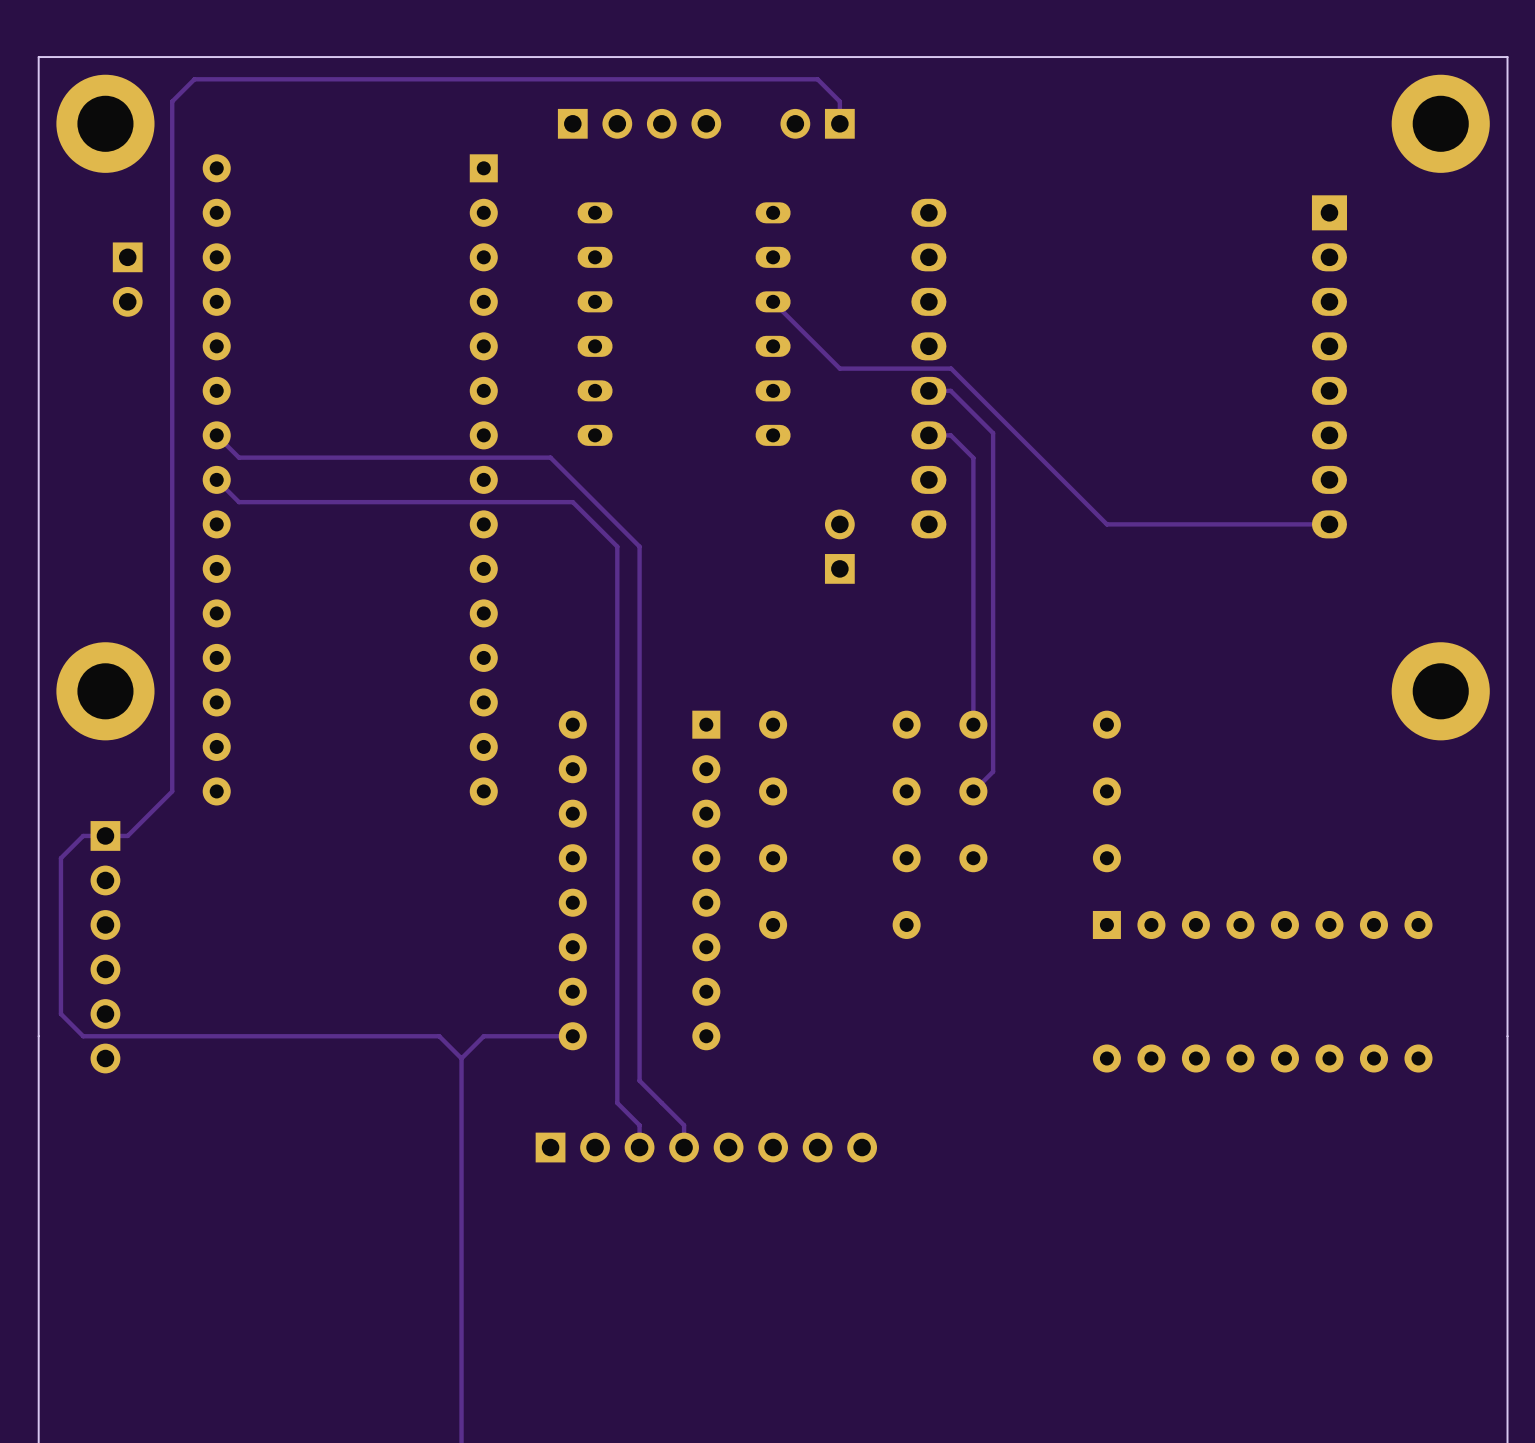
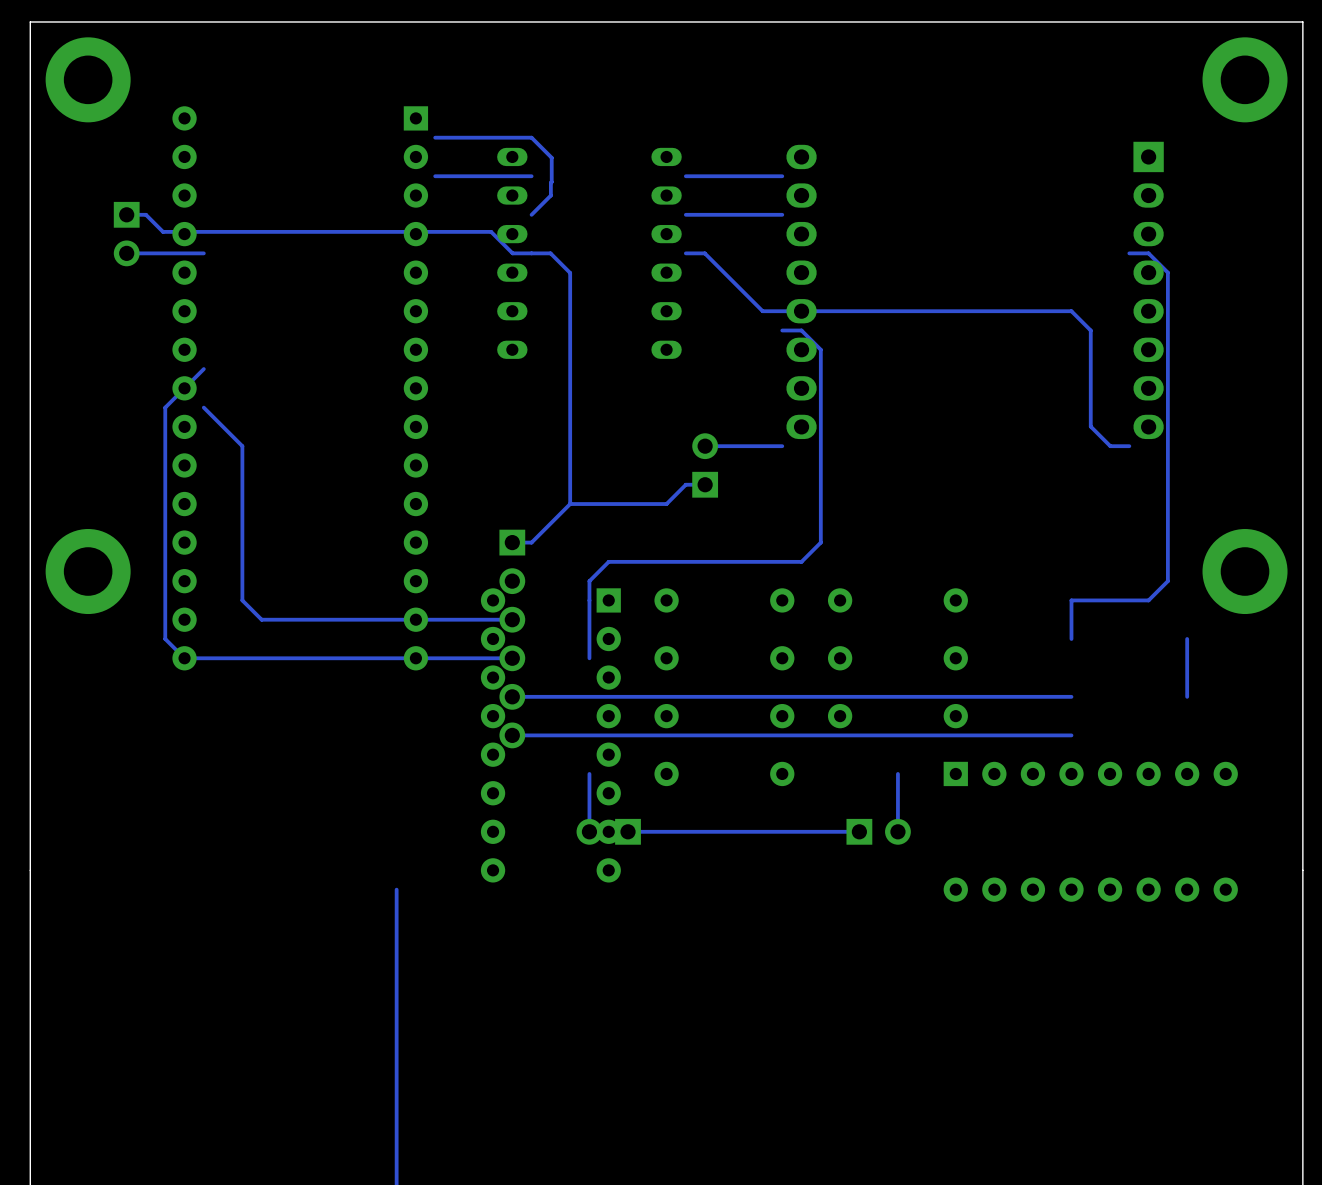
part: (639, 123) -> none
part: (817, 123) -> none
track: (839, 123) (839, 101) (817, 79) (194, 79) (172, 101) (172, 791) (127, 835) (83, 835) (60, 858) (60, 1014) (83, 1036) (439, 1036) (461, 1058) (483, 1036) (572, 1036) -> none
track: none -> (435, 137) (531, 137) (551, 157) (550, 195) (531, 214)
track: none -> (531, 176) (435, 176)
track: none -> (782, 176) (685, 176)
part position: (127, 279) -> (126, 234)
track: none -> (126, 214) (145, 214) (163, 231) (491, 231) (512, 253) (550, 253) (570, 272) (570, 504)
track: none -> (782, 214) (685, 214)
track: (773, 301) (839, 368) (951, 368) (1106, 524) (1329, 524) -> none
track: none -> (203, 253) (126, 253)
track: none -> (685, 253) (704, 253) (762, 311) (801, 311)
track: none -> (1129, 253) (1148, 253) (1167, 272) (1167, 581) (1148, 600) (1071, 600) (1071, 638)
track: (950, 390) (993, 433) (993, 771) (973, 791) -> (820, 311) (1071, 311) (1090, 330) (1090, 426) (1110, 446) (1129, 446)
track: none -> (782, 330) (801, 330) (820, 349) (820, 542) (801, 561) (608, 561) (589, 581) (589, 658)
track: (216, 435) (238, 457) (550, 457) (639, 546) (639, 1080) (684, 1125) (684, 1147) -> none
track: (928, 435) (950, 435) (973, 457) (973, 724) -> none
track: none -> (203, 369) (165, 407) (165, 638) (184, 658) (512, 658)
track: (216, 479) (238, 502) (572, 502) (617, 546) (617, 1103) (639, 1125) (639, 1147) -> none
track: none -> (203, 407) (242, 446) (242, 600) (261, 619) (512, 619)
part position: (839, 546) -> (705, 465)
track: none -> (782, 446) (705, 446)
track: none -> (705, 484) (685, 484) (666, 504) (570, 504)
track: none -> (570, 504) (531, 542) (512, 542)
part: none -> (512, 638)
track: none -> (1187, 638) (1187, 696)
track: none -> (1071, 696) (512, 696)
track: none -> (1071, 735) (512, 735)
track: none -> (589, 773) (589, 831)
track: none -> (897, 773) (897, 831)
part: (105, 947) -> none
part: none -> (608, 831)
track: none -> (859, 831) (628, 831)
part: none -> (878, 831)
part: (706, 1147) -> none

